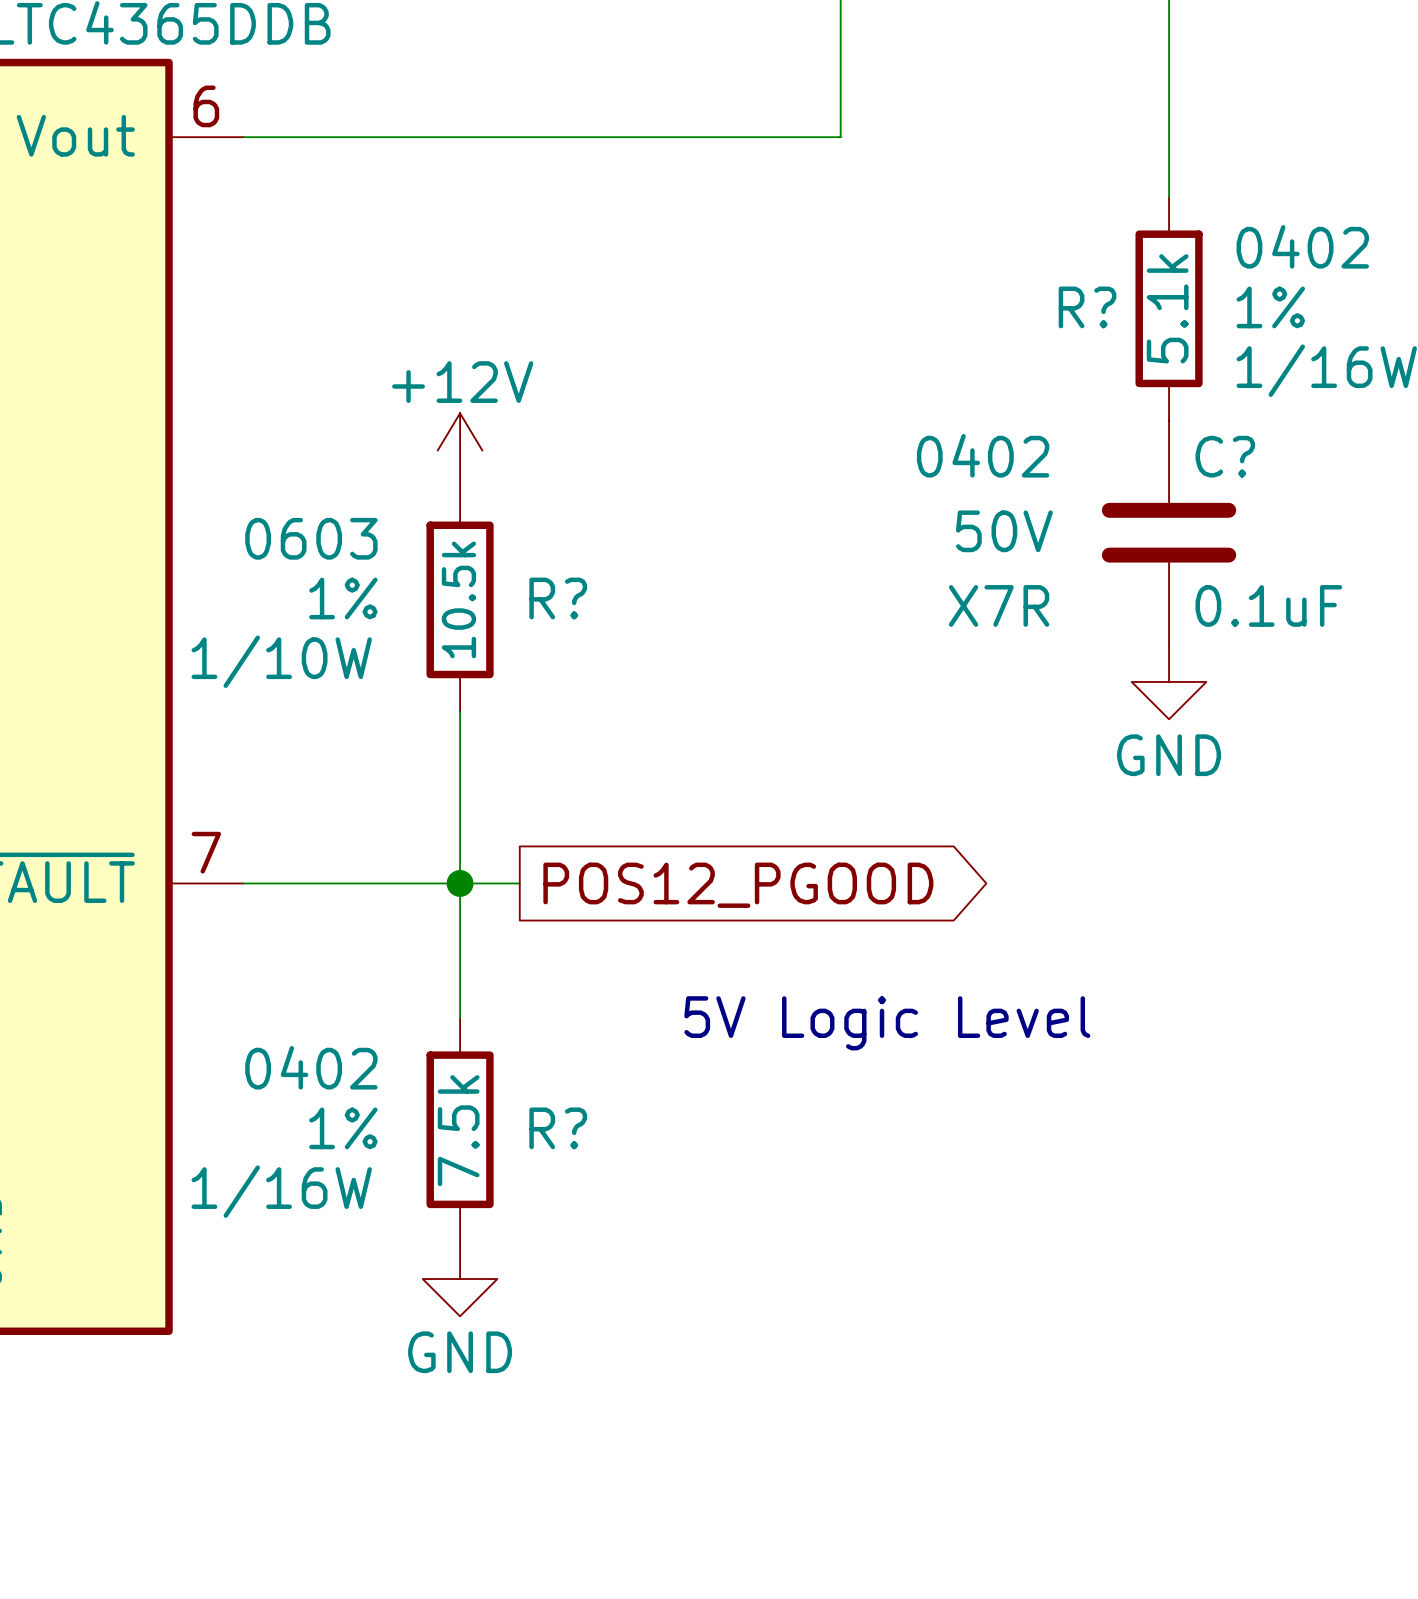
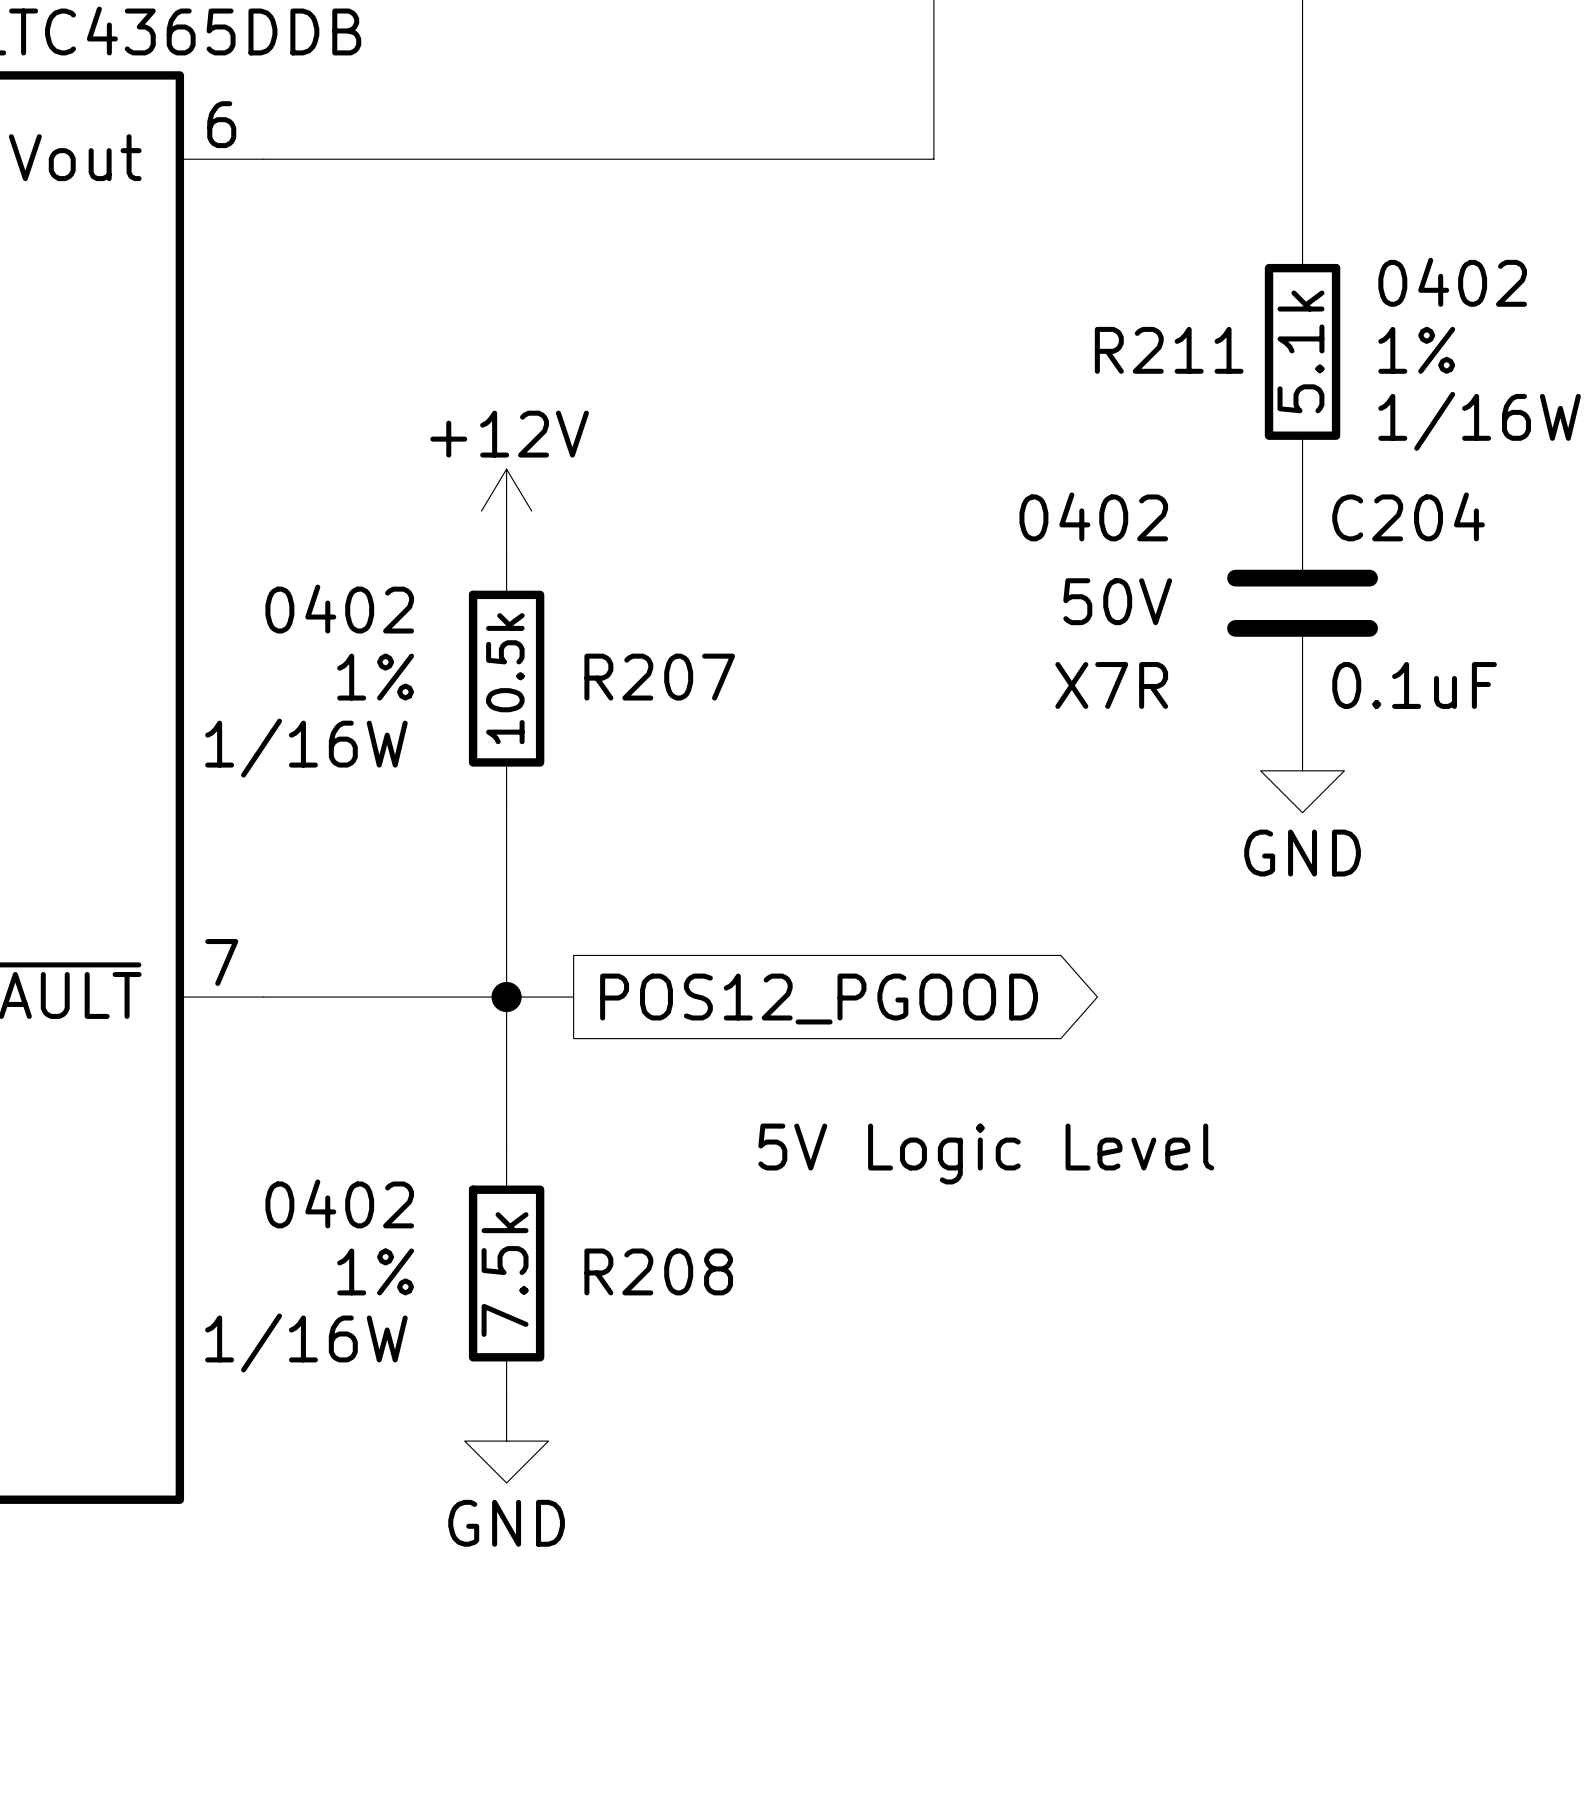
R? name: R? (1087, 307) -> R211 (1169, 350)
C? name: C? (1225, 456) -> C204 (1408, 516)
R? text: 0603 (311, 538) -> 0402 (339, 609)
R? name: R? (558, 598) -> R207 (659, 677)
R? text: 1/10W (281, 661) -> 1/16W (306, 748)
R? name: R? (558, 1128) -> R208 (658, 1271)

